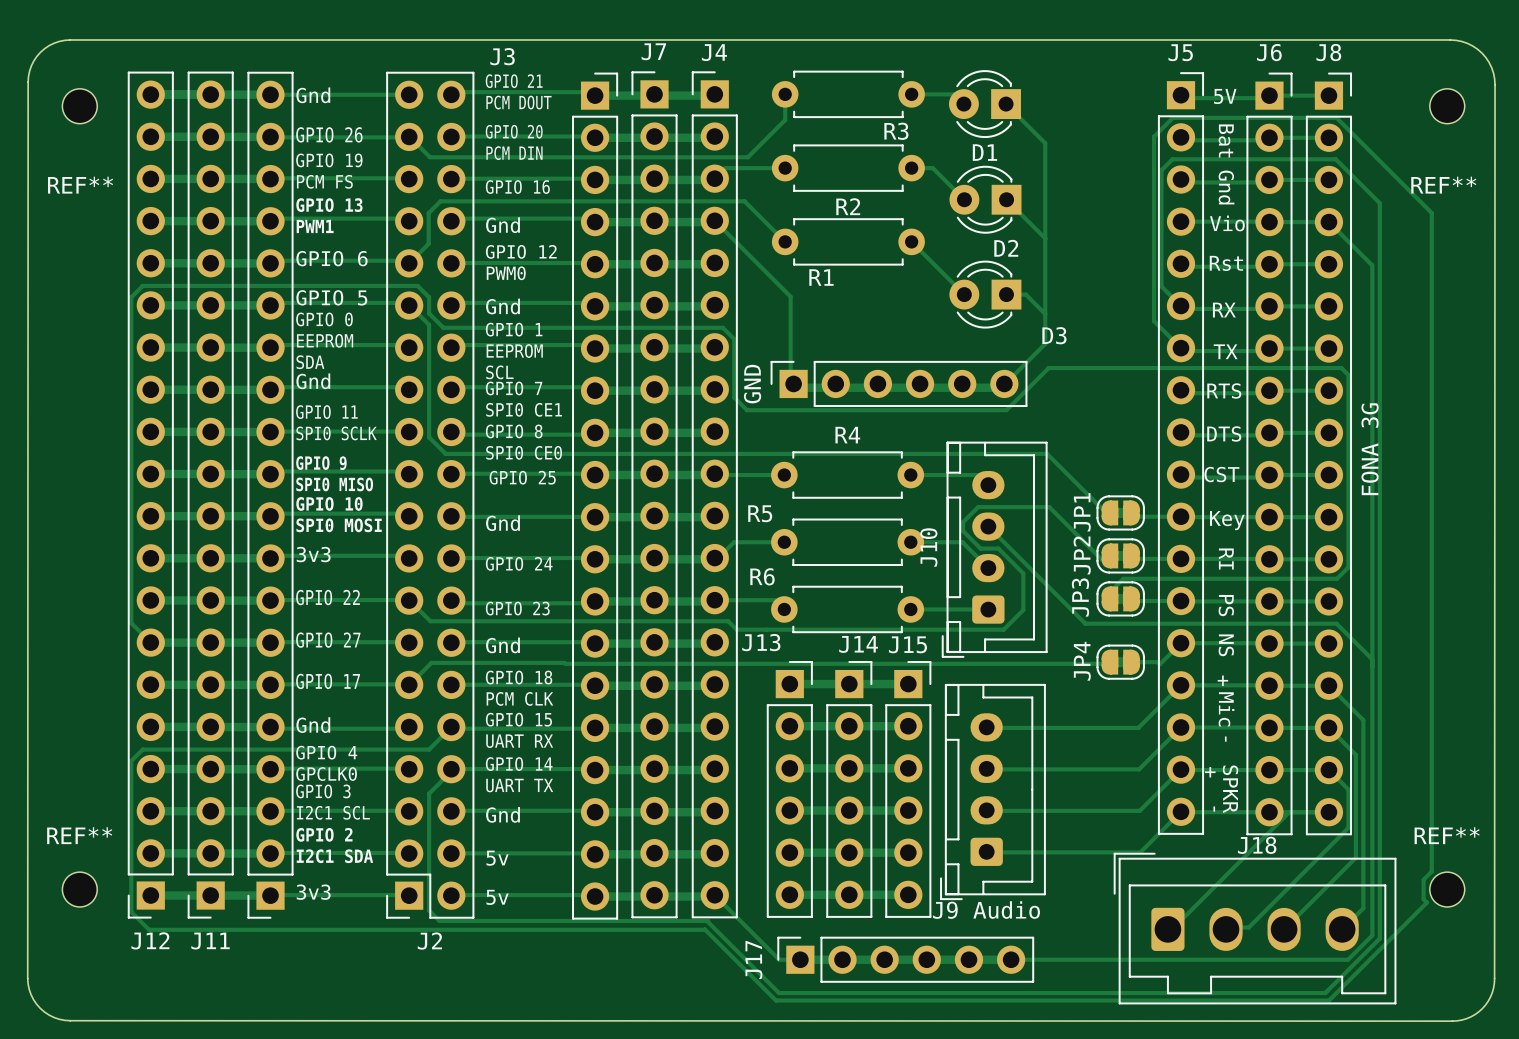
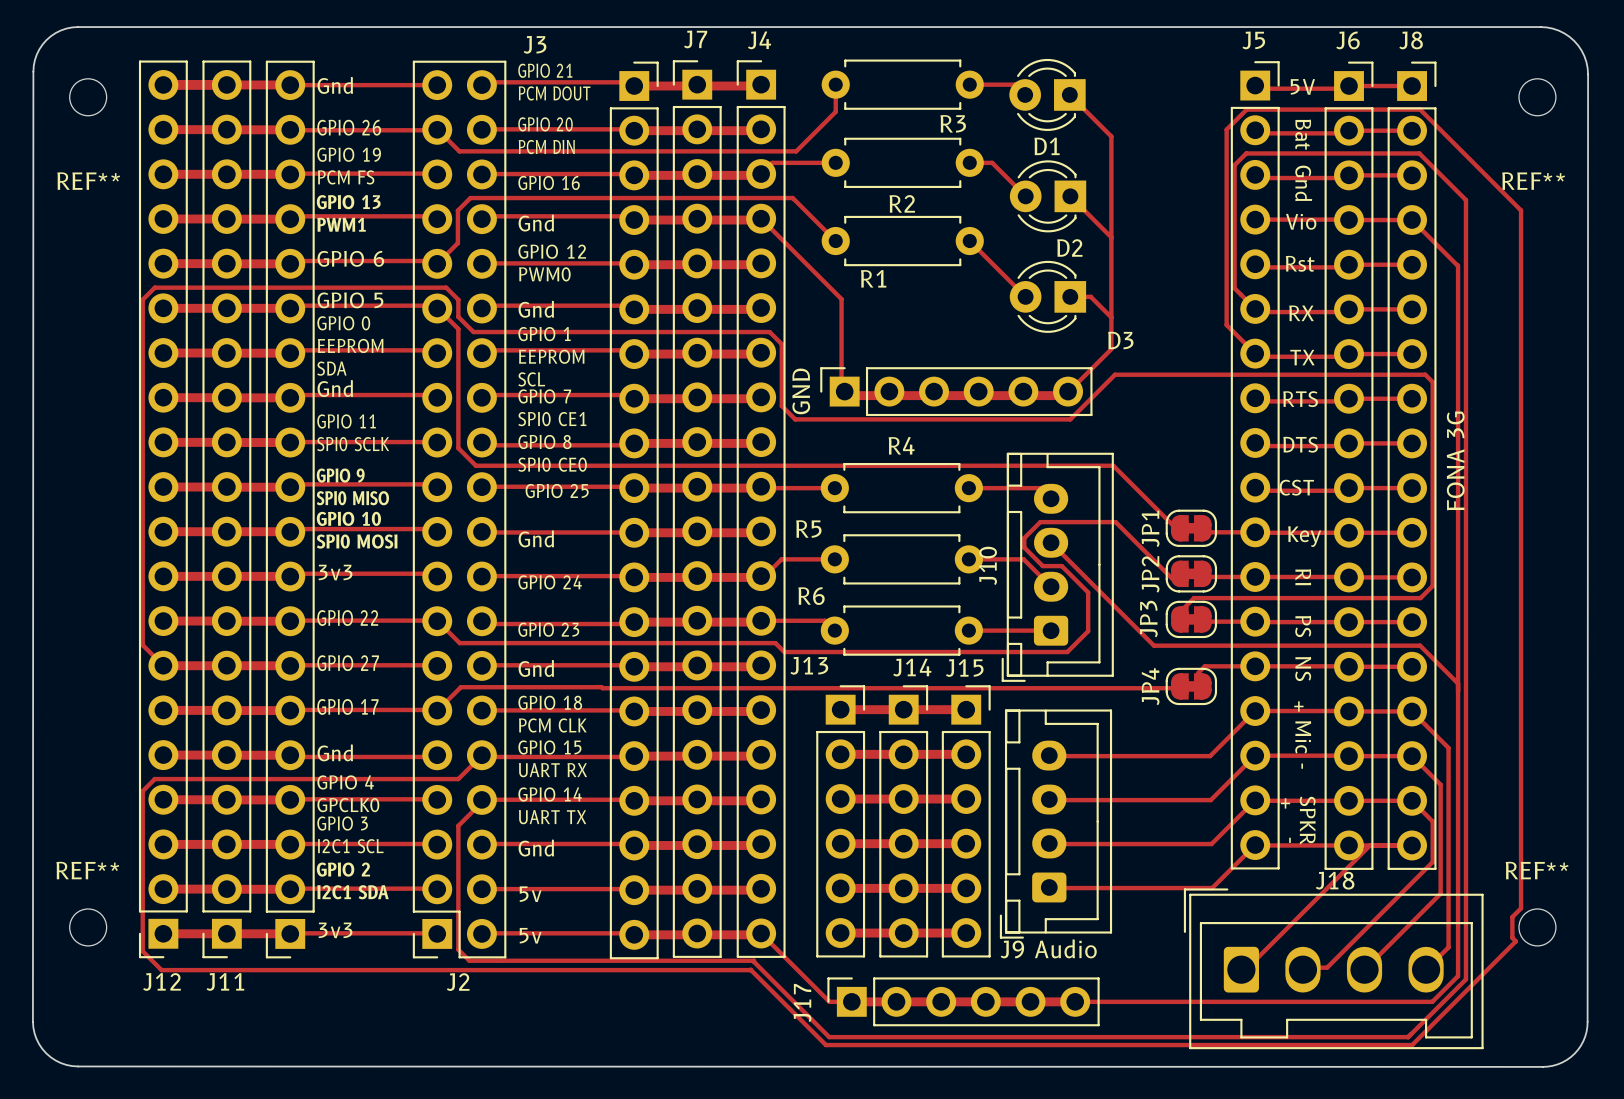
track: (1180, 643) (1159, 664) (1157, 662) (1131, 662) -> (1255, 666) (1204, 666) (1198, 673)

